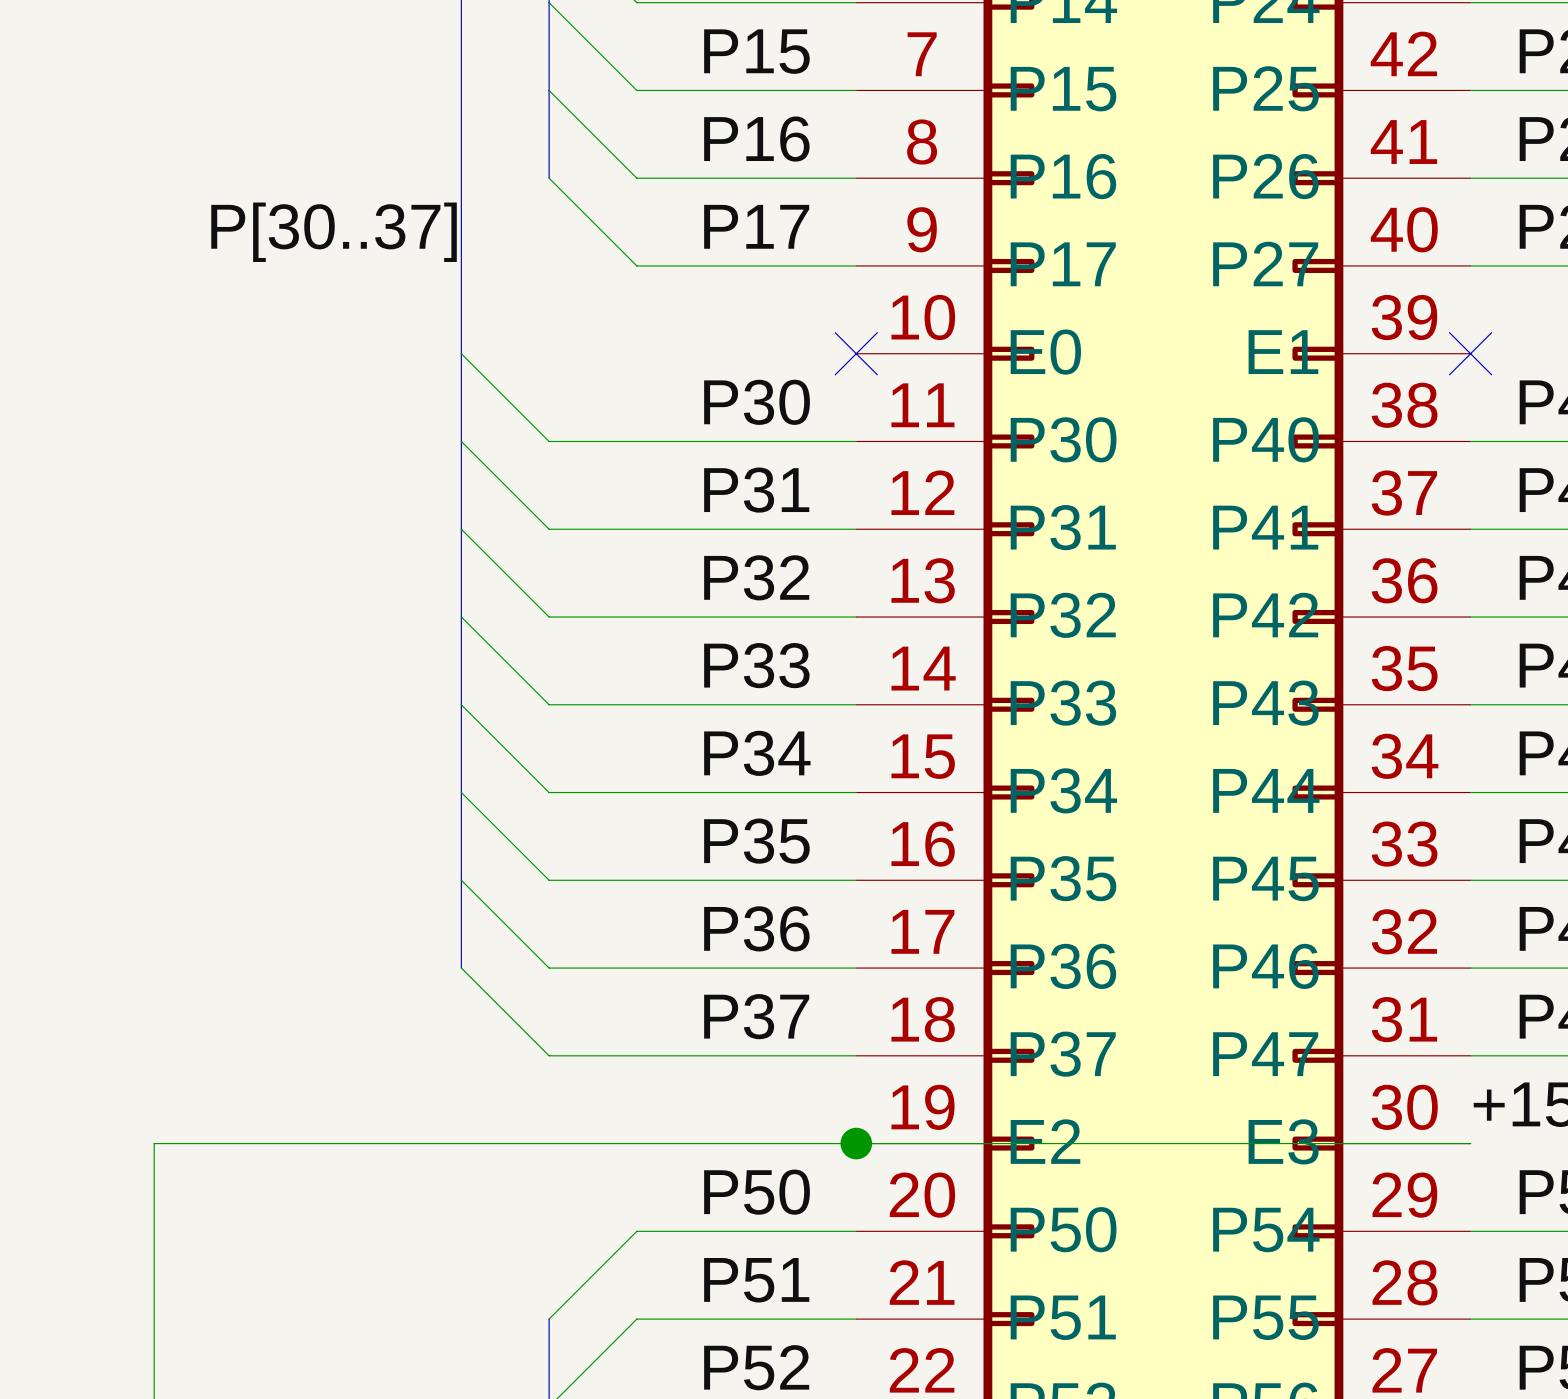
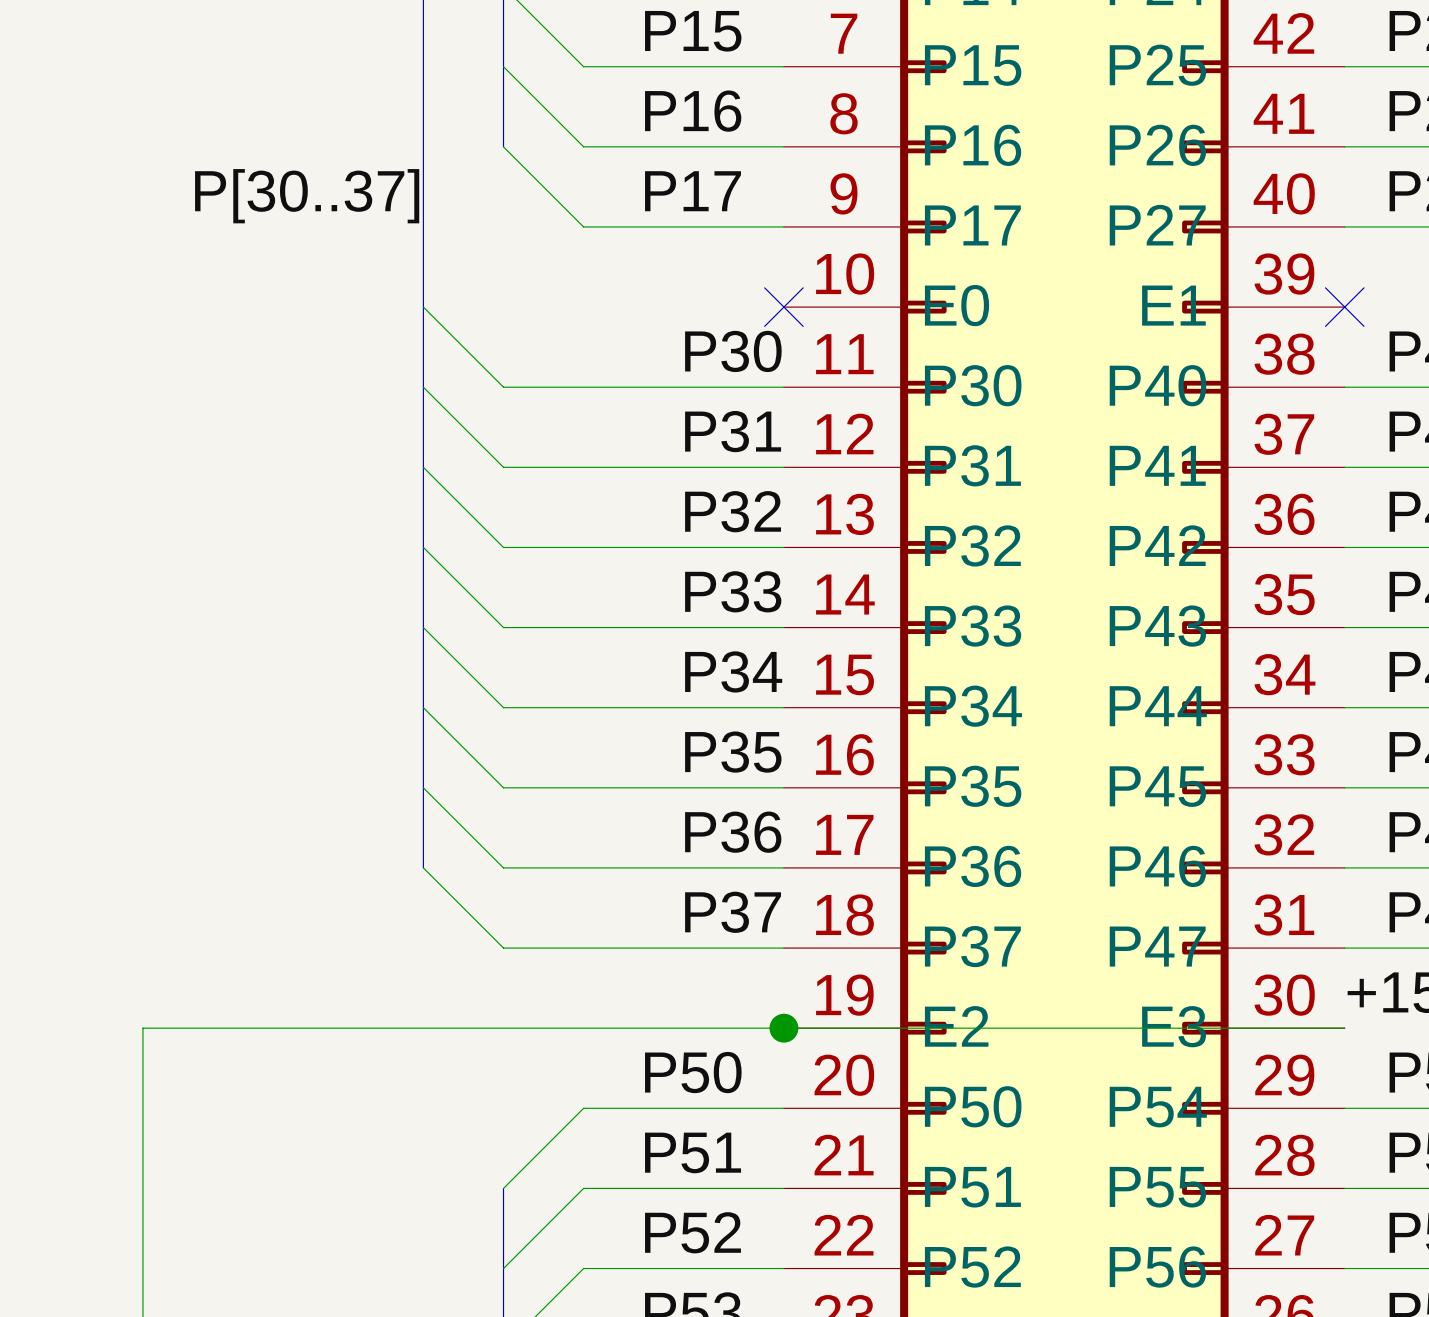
label position: P30 (757, 402) -> P30 (733, 351)
label position: P31 (756, 490) -> P31 (733, 431)
label position: P32 (756, 577) -> P32 (733, 511)
label position: P33 (756, 665) -> P33 (733, 591)
label position: P34 (757, 753) -> P34 (733, 671)
label position: P35 (756, 841) -> P35 (733, 752)
label position: P36 (756, 928) -> P36 (733, 832)
label position: P37 (756, 1016) -> P37 (733, 912)

